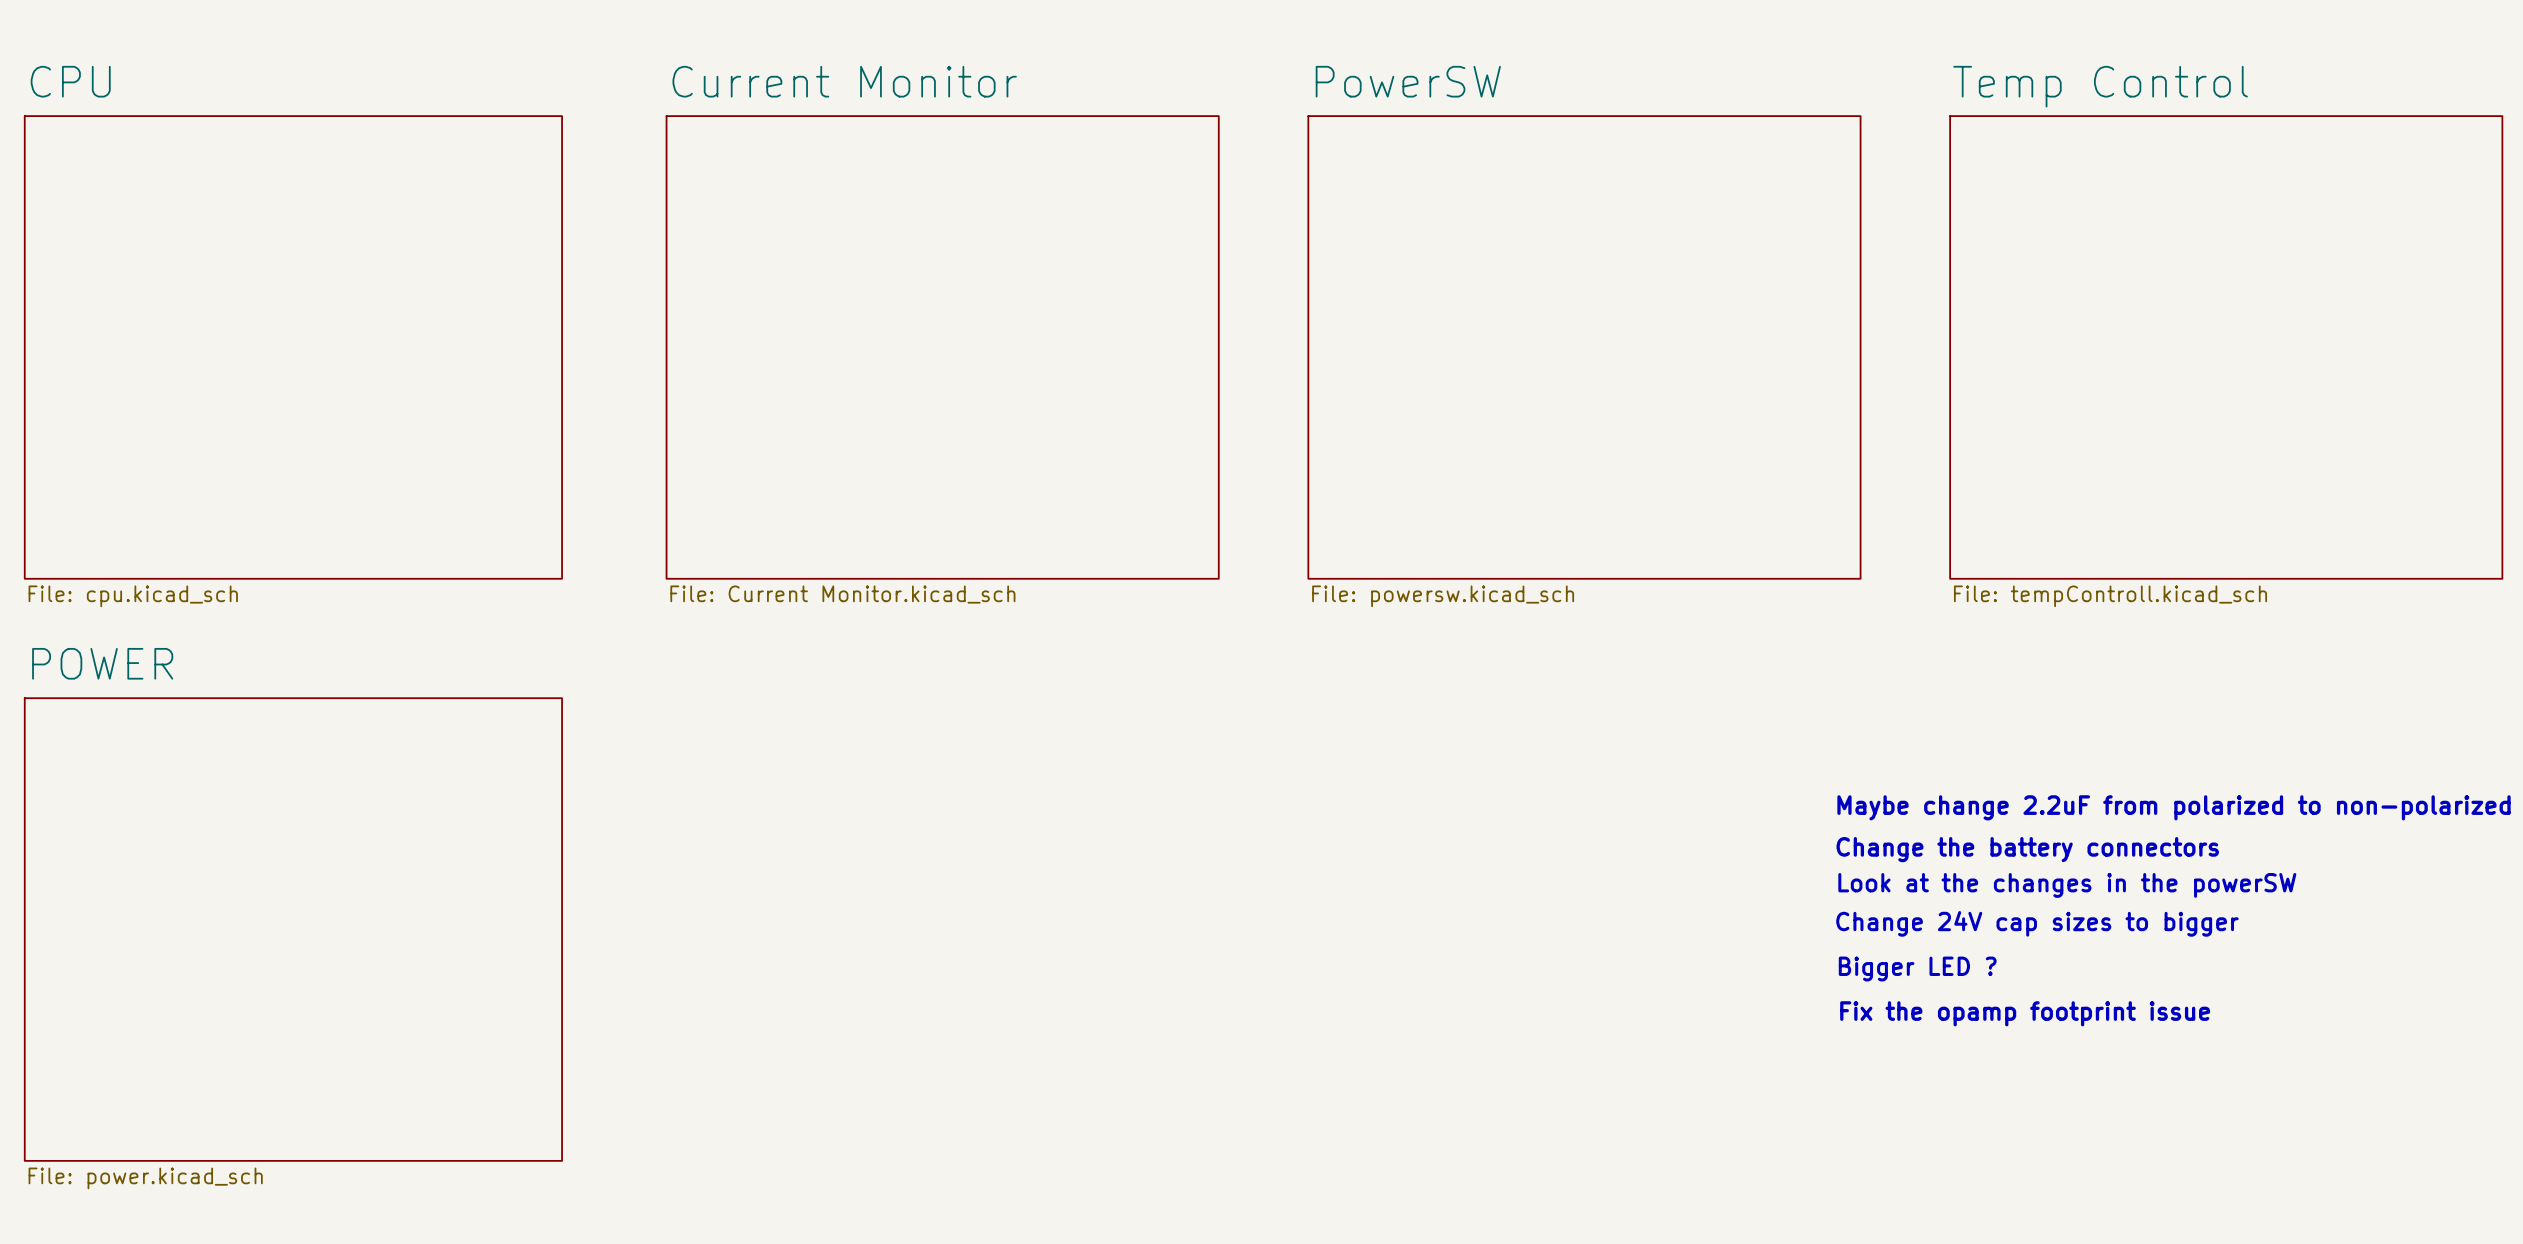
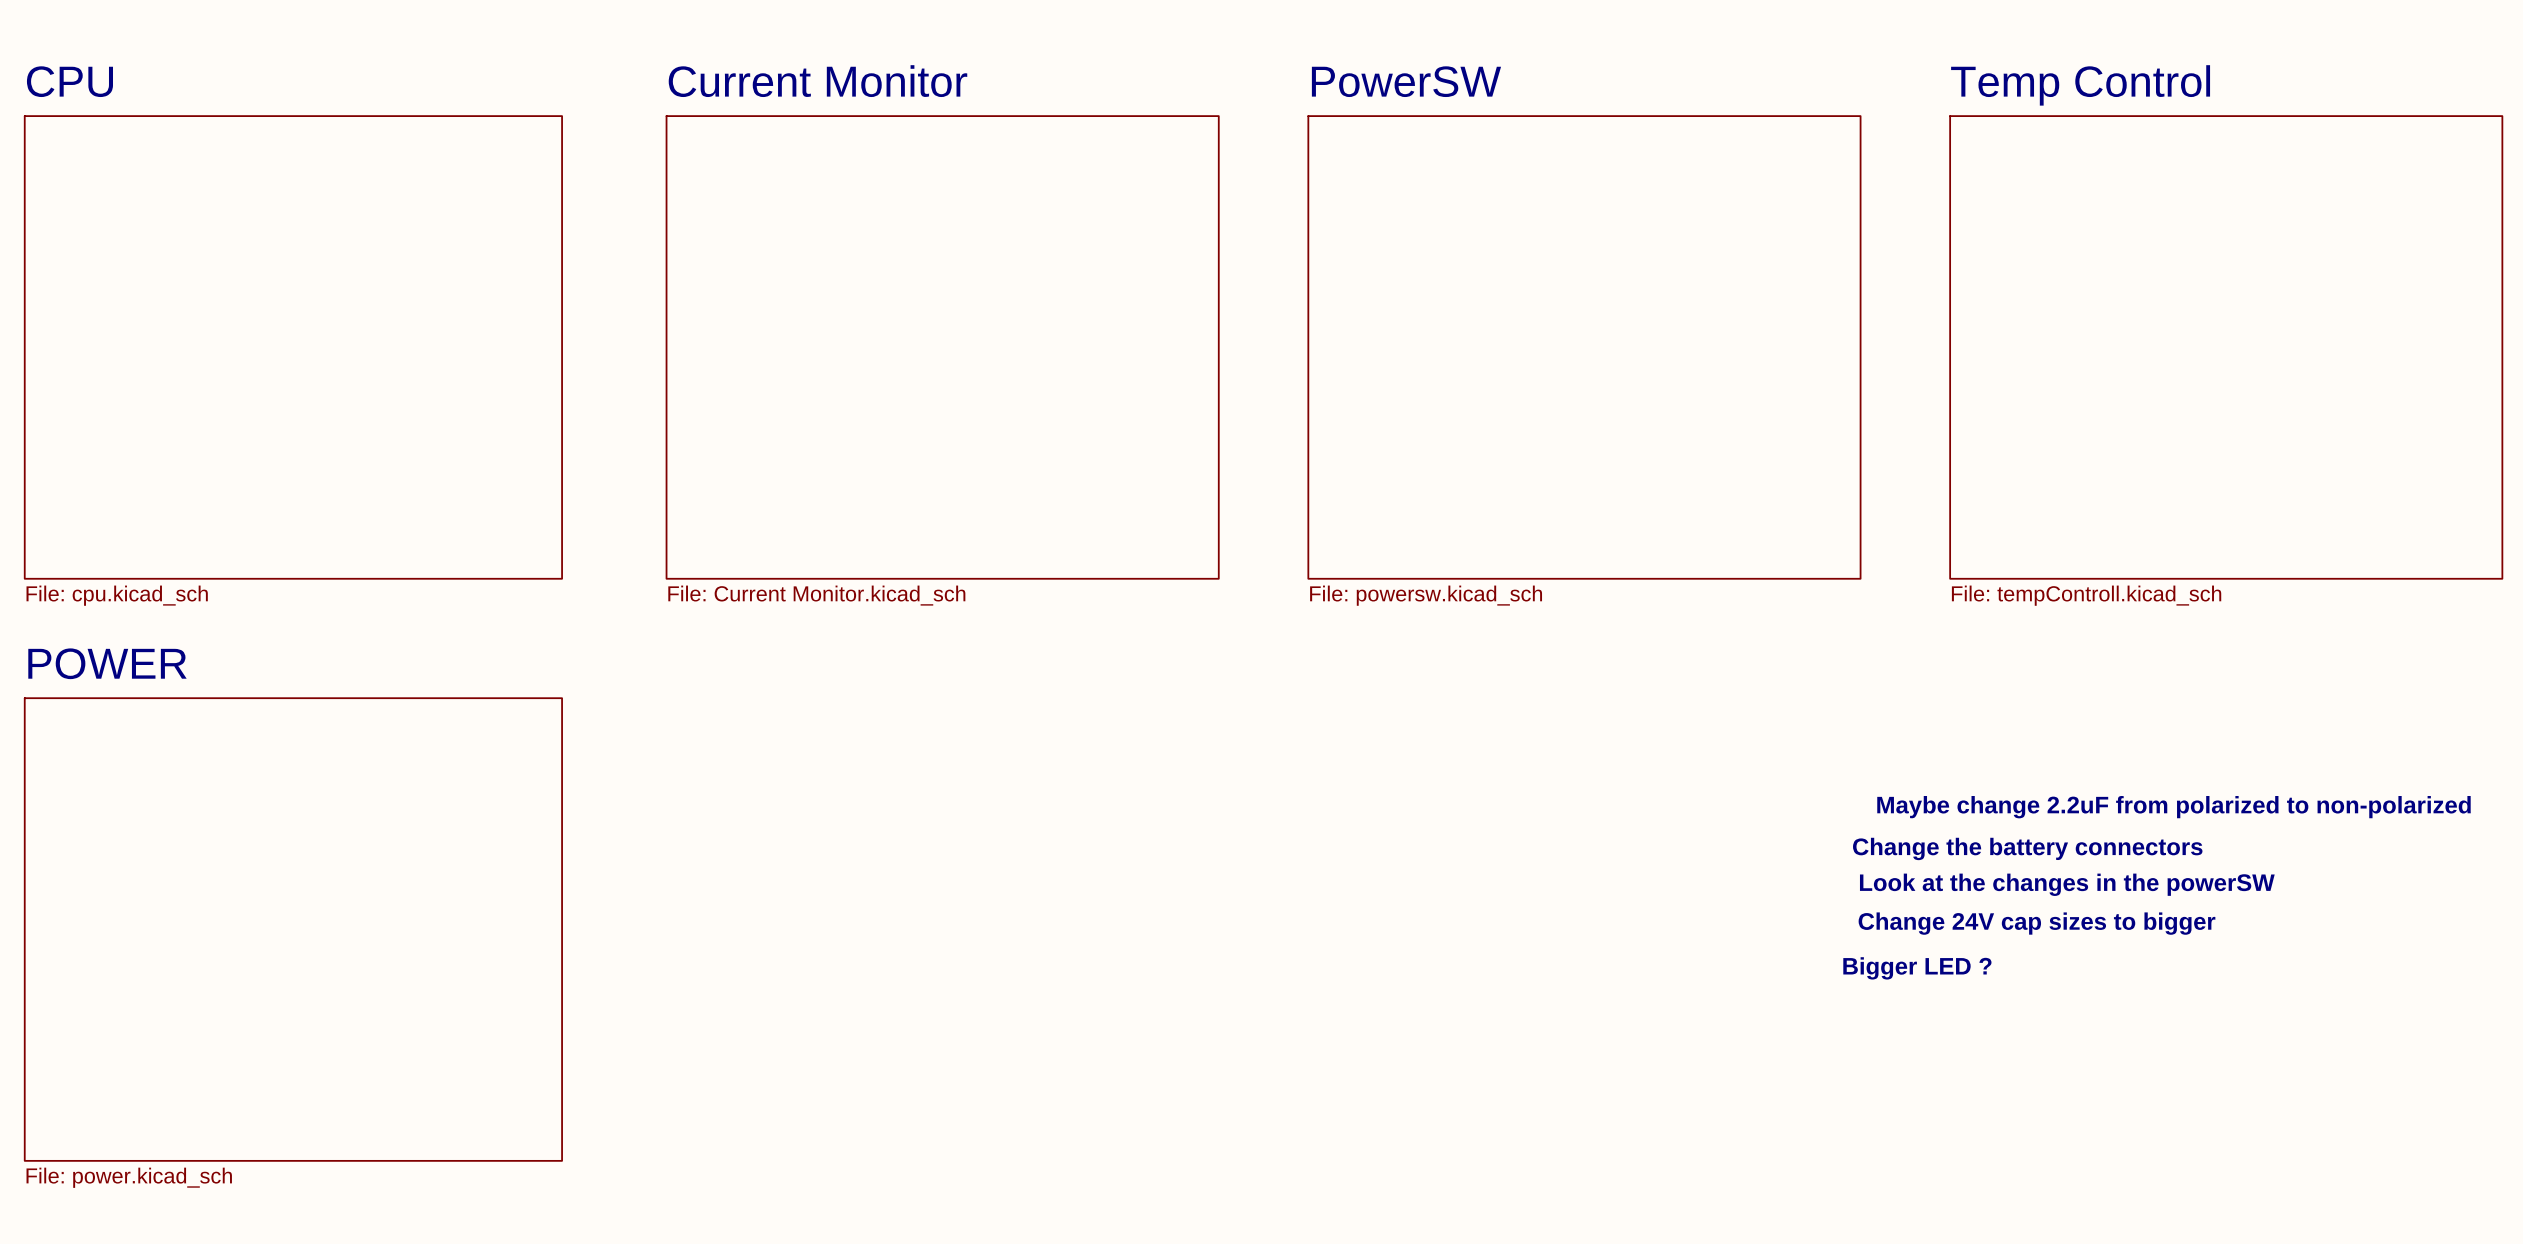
text: Fix the opamp footprint issue (2025, 1013) -> none

